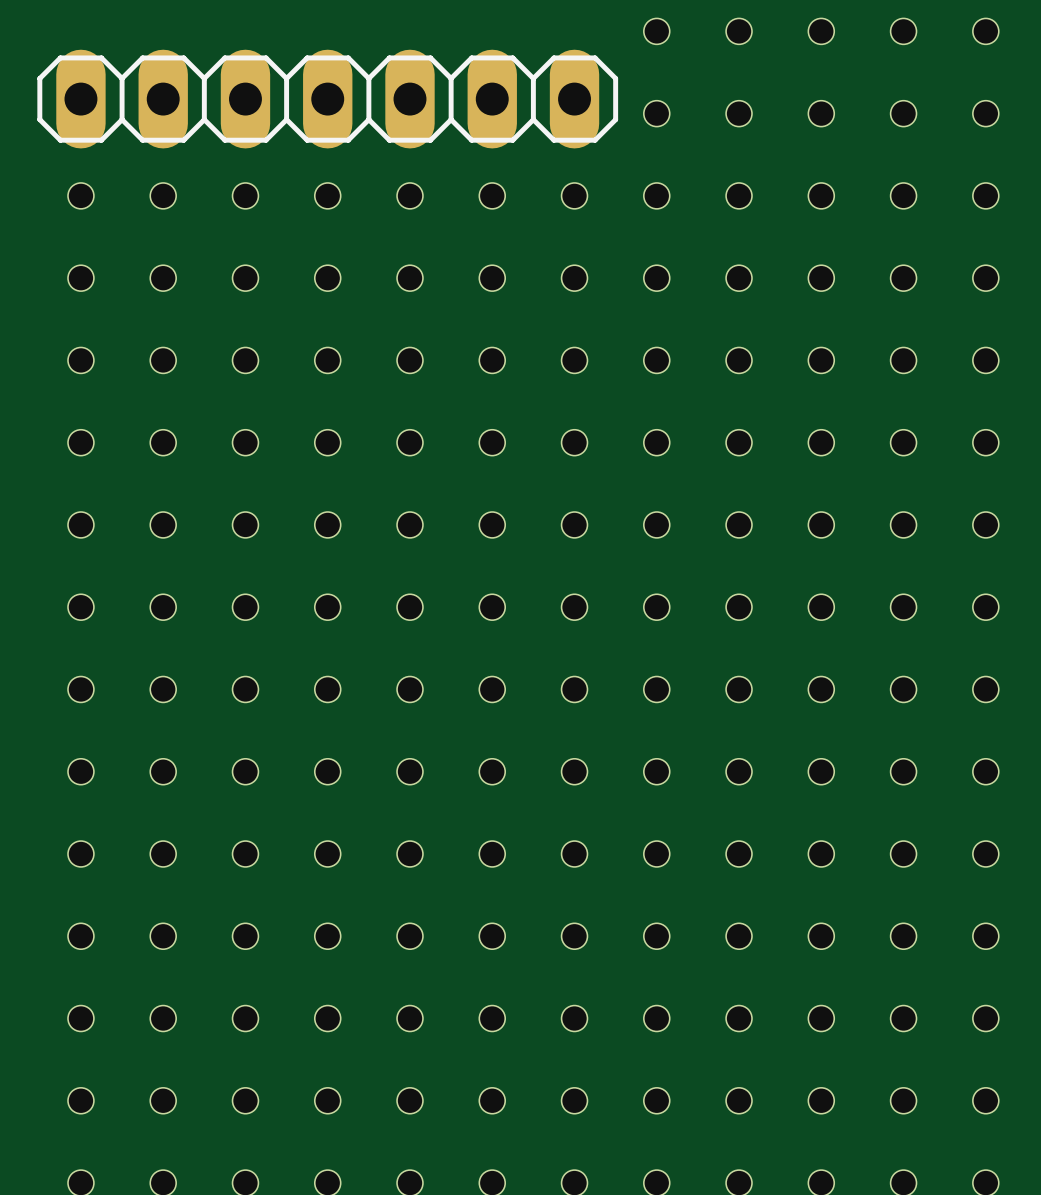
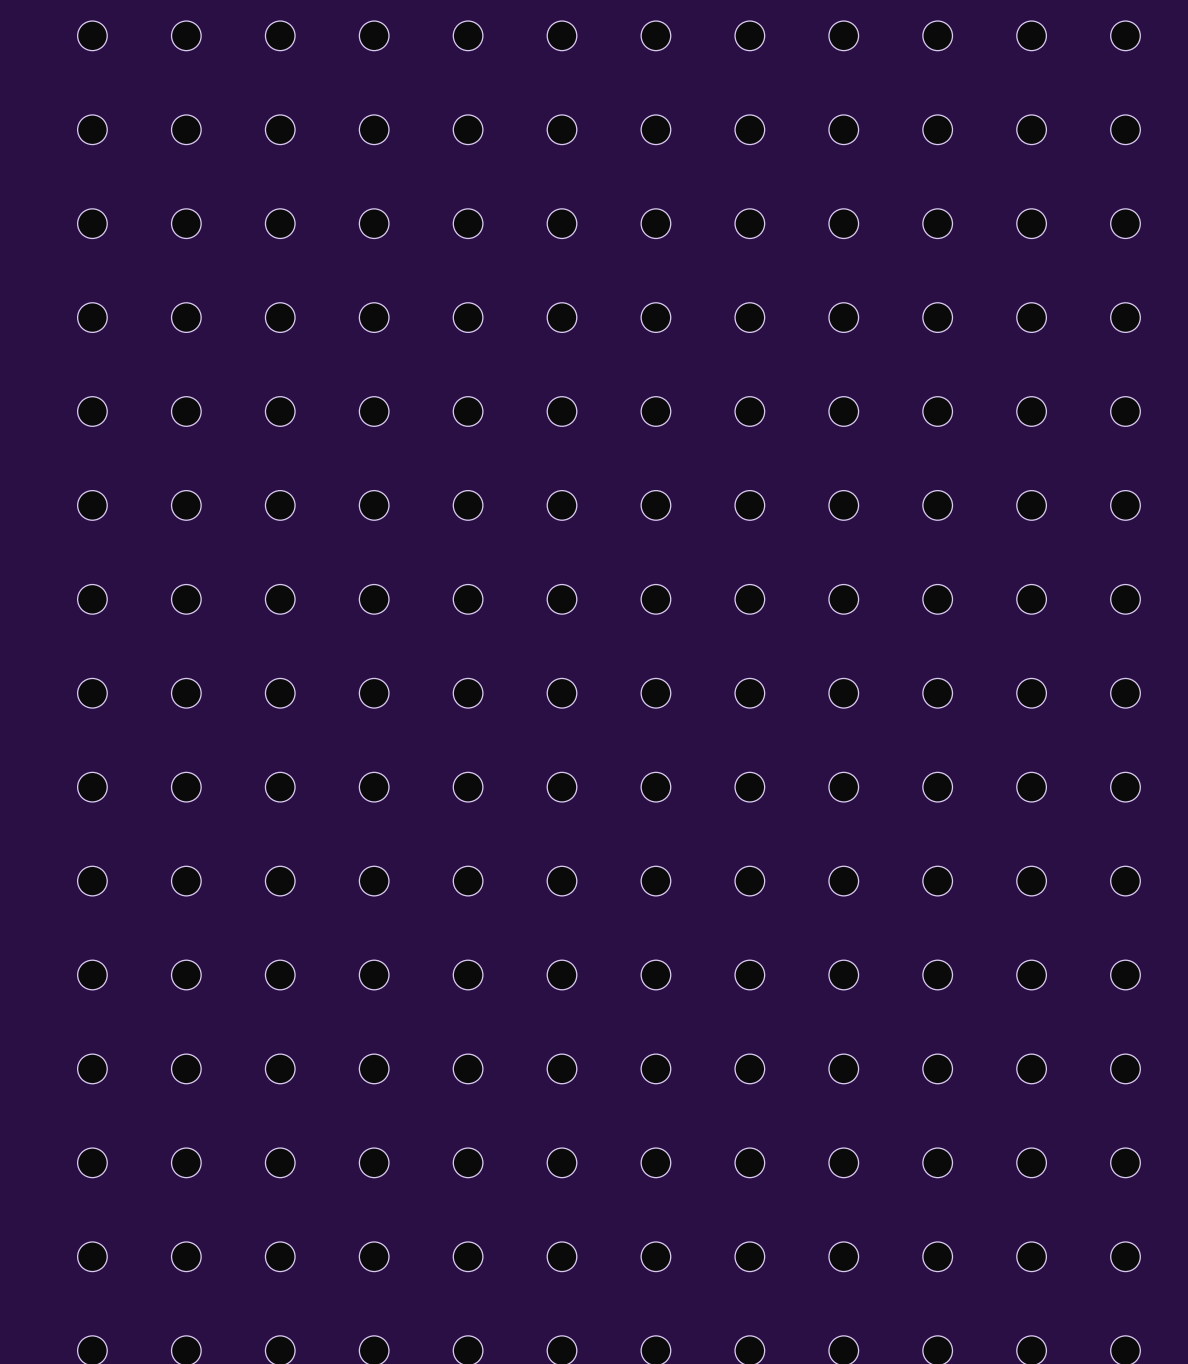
hole: none -> (92, 35)
hole: none -> (186, 35)
hole: none -> (280, 35)
hole: none -> (374, 35)
hole: none -> (468, 35)
hole: none -> (562, 35)
hole: none -> (655, 35)
part: (327, 99) -> none
hole: none -> (92, 129)
hole: none -> (186, 129)
hole: none -> (280, 129)
hole: none -> (374, 129)
hole: none -> (468, 129)
hole: none -> (562, 129)
hole: none -> (655, 129)

